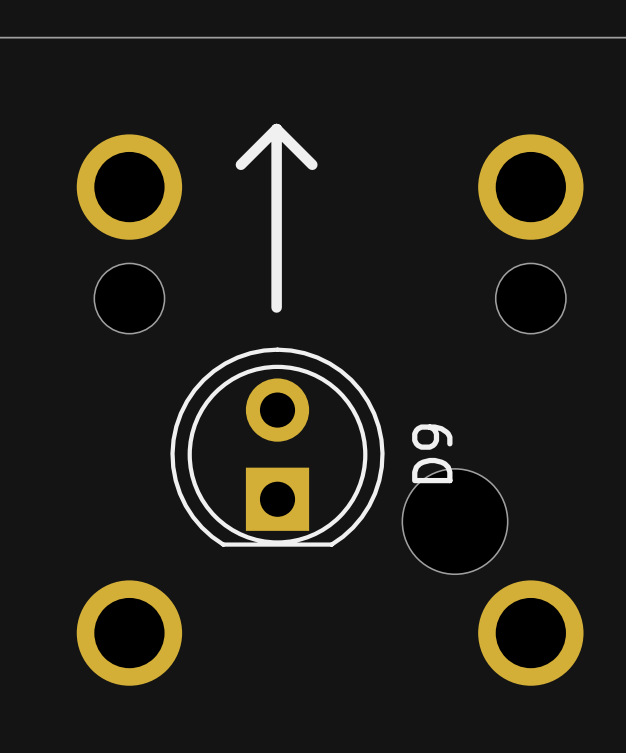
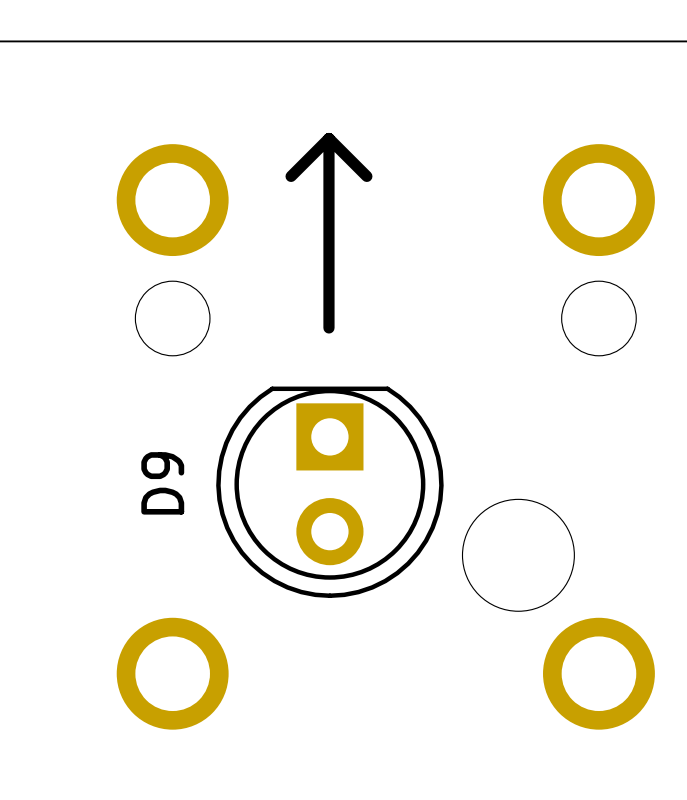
D9 rotation: 0° (277, 447) -> 180° (329, 492)

